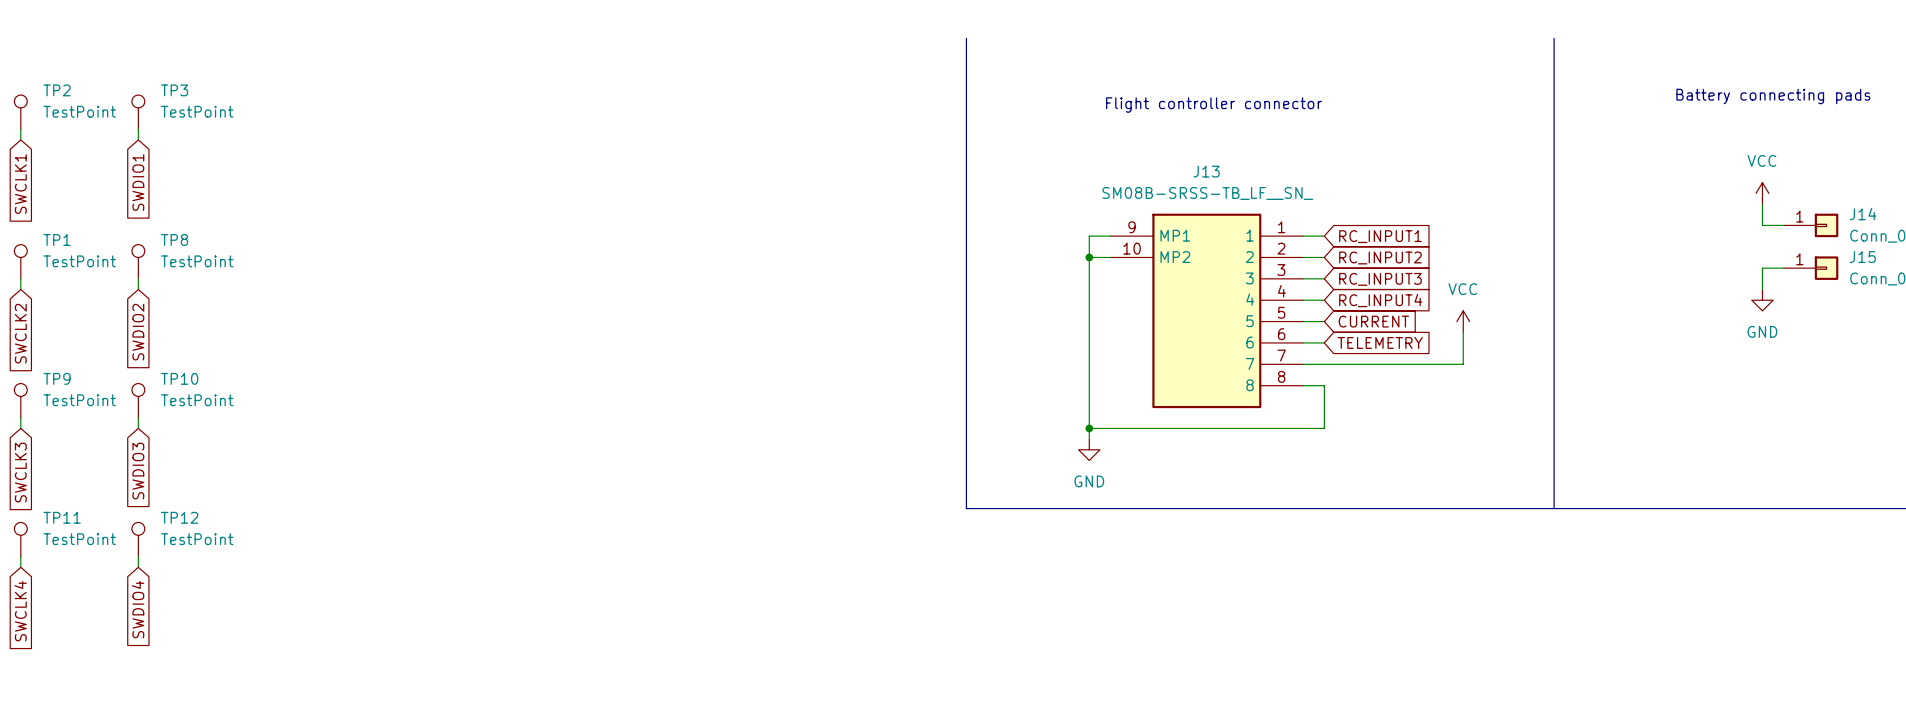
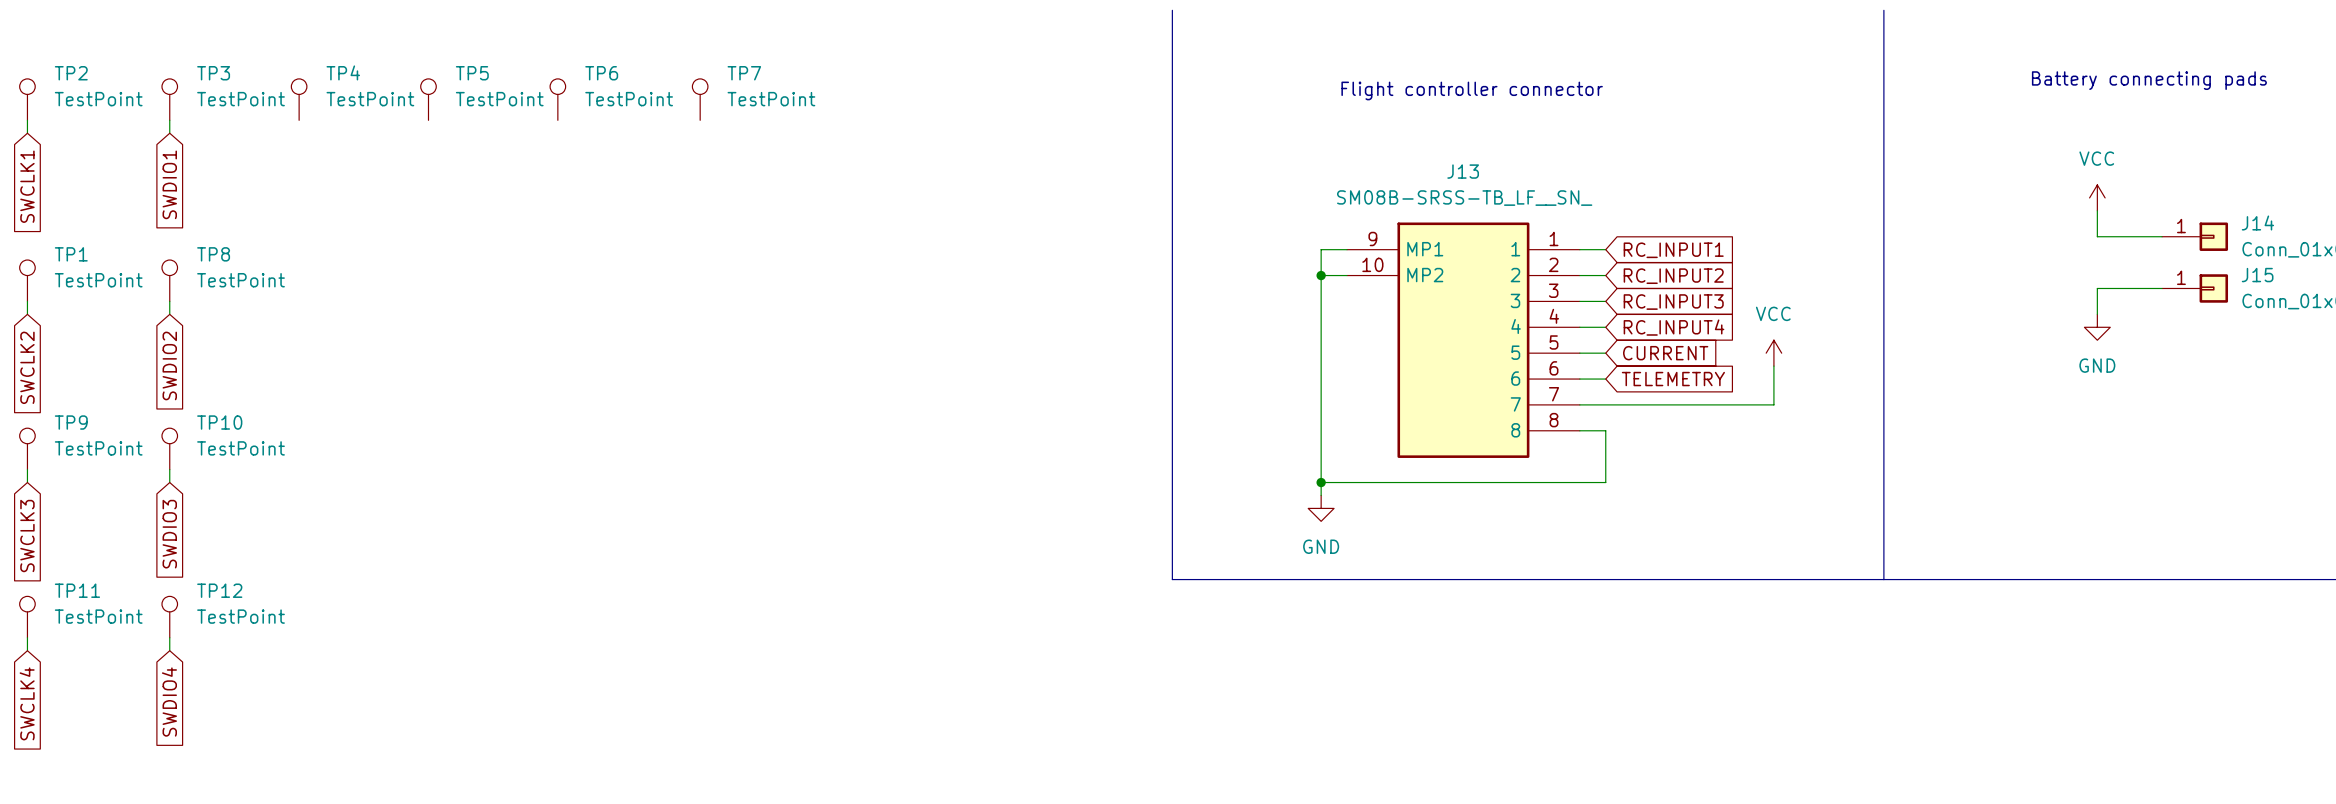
TP4: none -> TestPoint (299, 99)
TP5: none -> TestPoint (428, 99)
TP6: none -> TestPoint (557, 99)
TP7: none -> TestPoint (700, 99)
power symbol position: VCC (1762, 193) -> VCC (2097, 197)
wire: (1762, 204) (1762, 225) -> (2097, 210) (2097, 236) (2136, 236)
wire: (1762, 268) (1762, 289) -> (2136, 288) (2097, 288) (2097, 314)
power symbol position: GND (1762, 300) -> GND (2097, 327)

